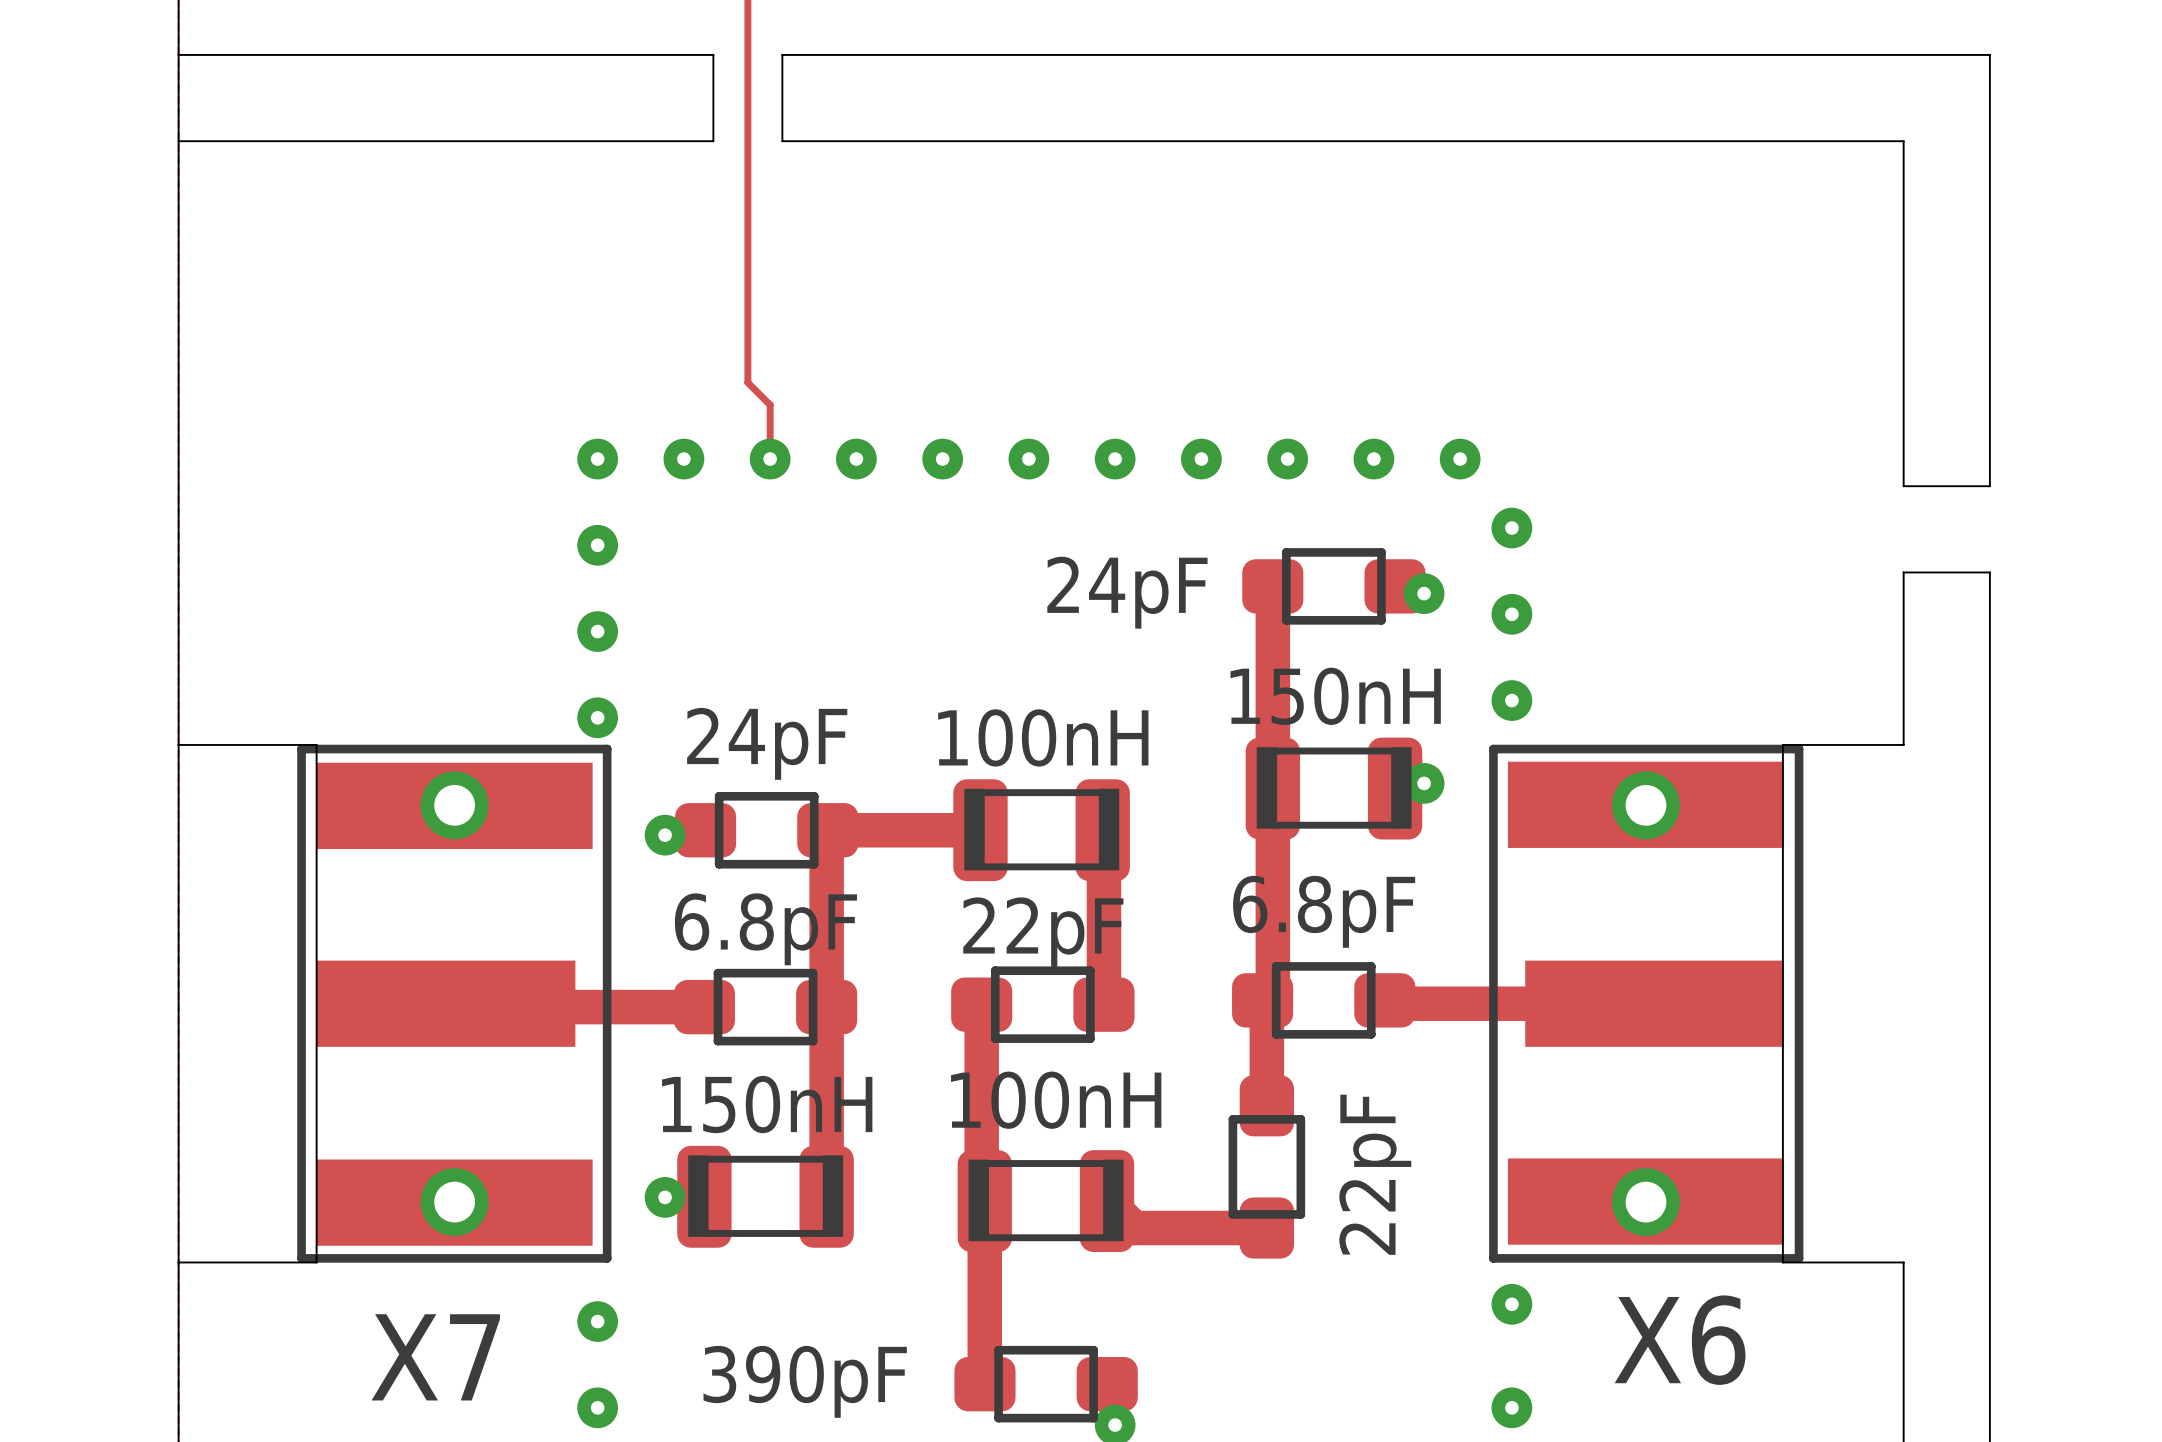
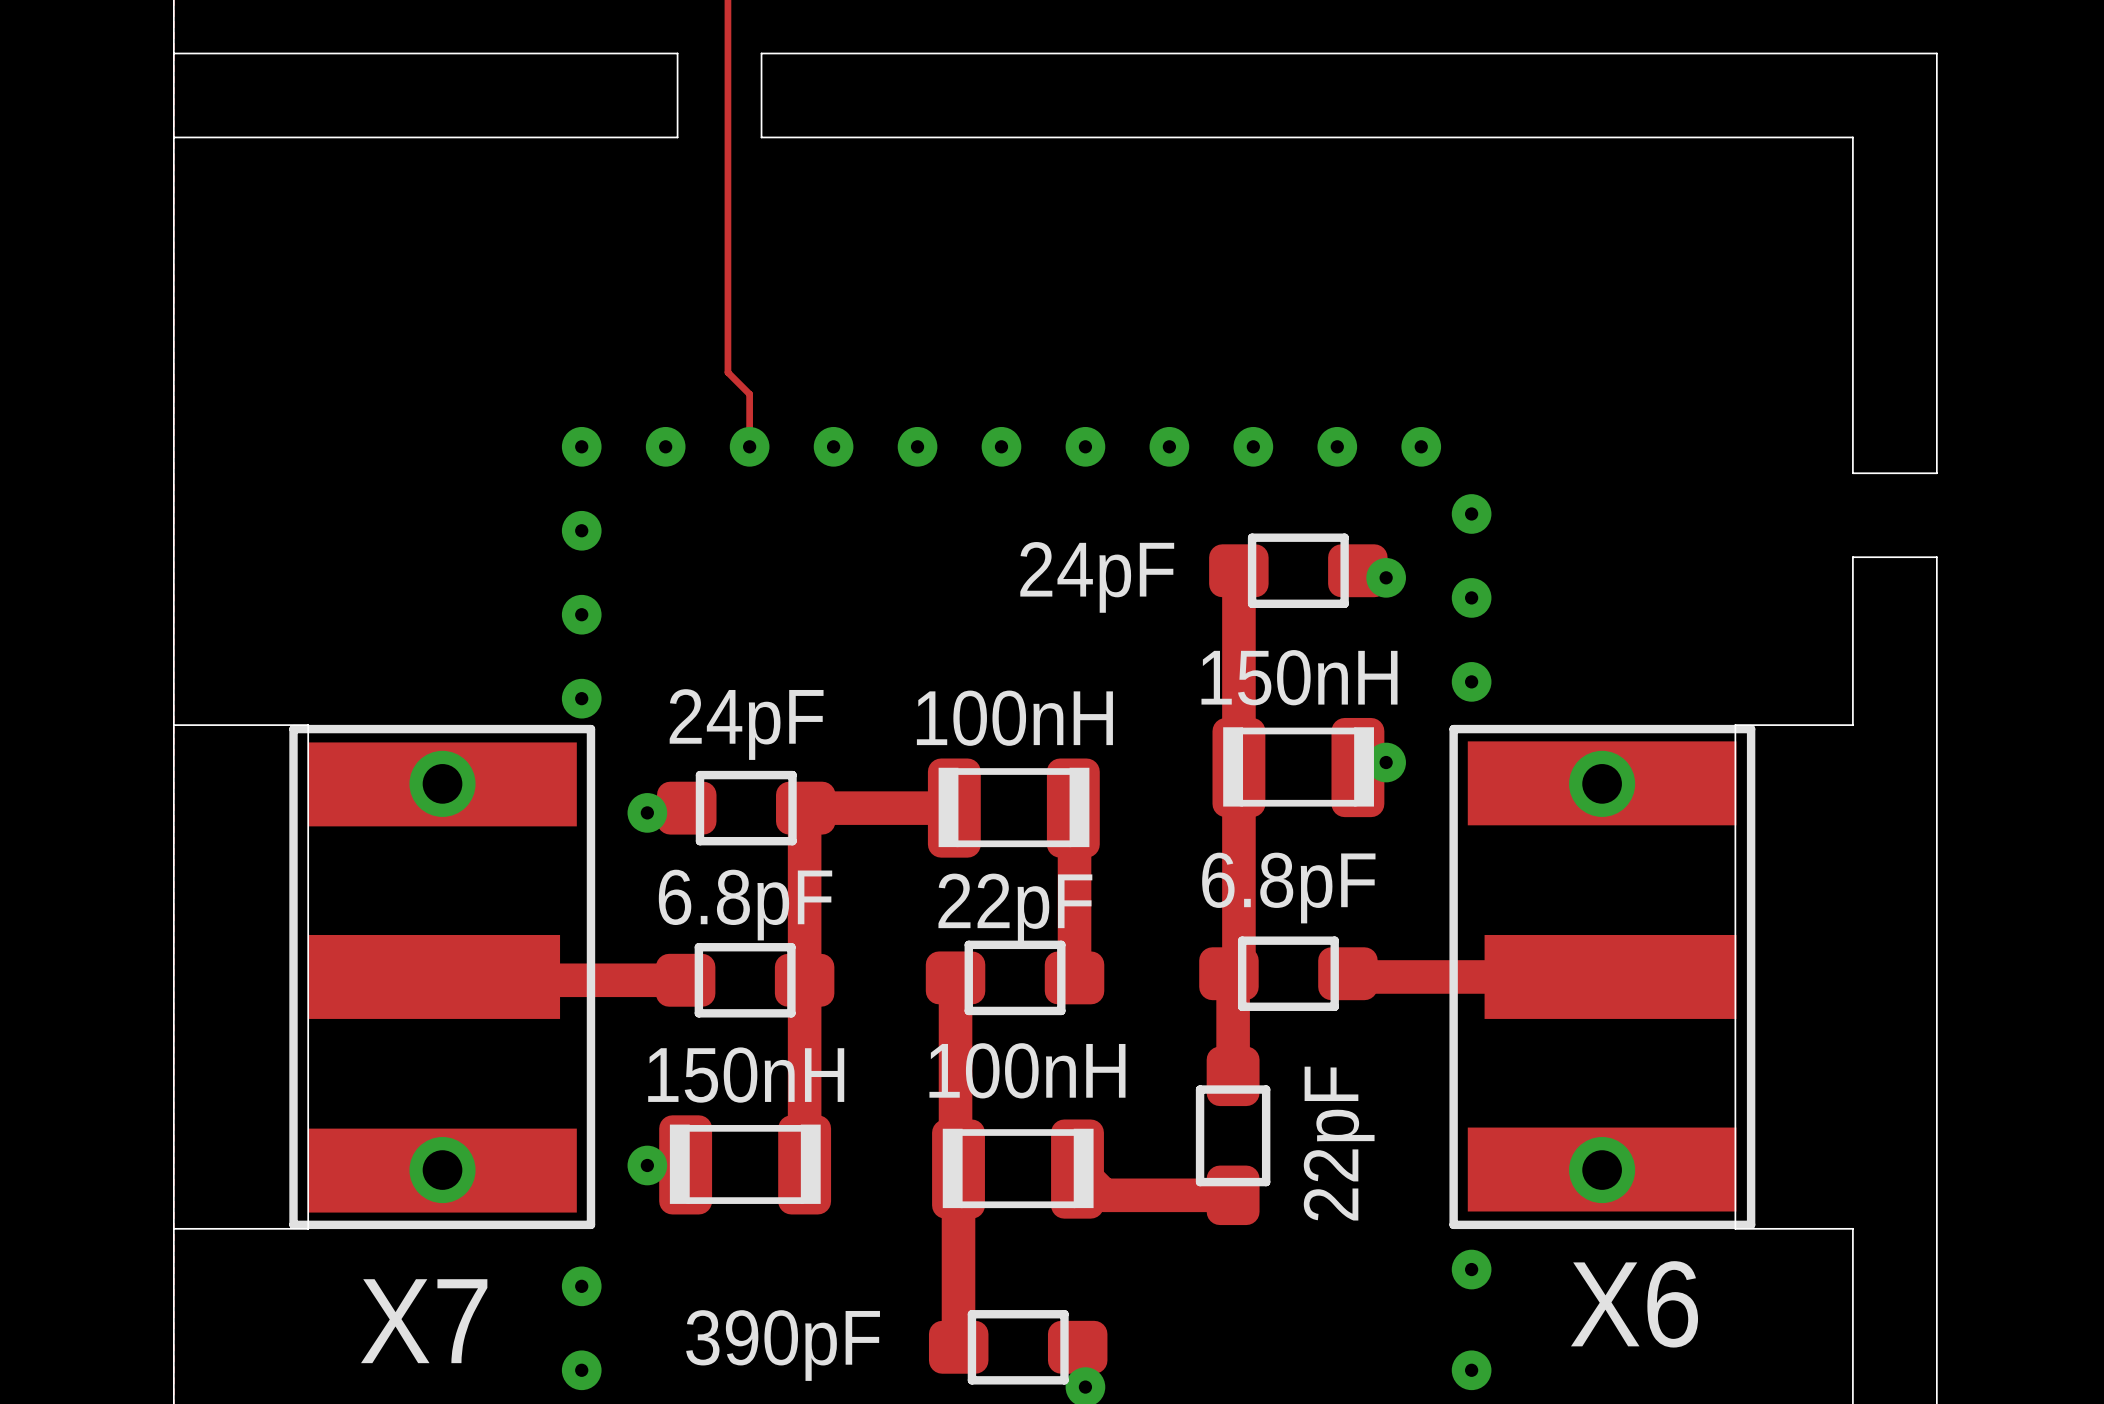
board edge: (696, 54) (713, 54) (713, 141) (696, 141) -> (677, 53) (677, 137)

